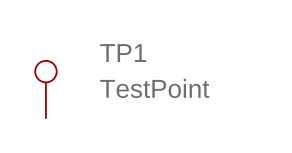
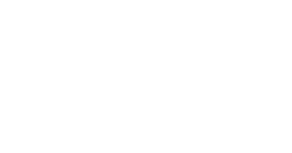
TP1: TestPoint (45, 89) -> none

